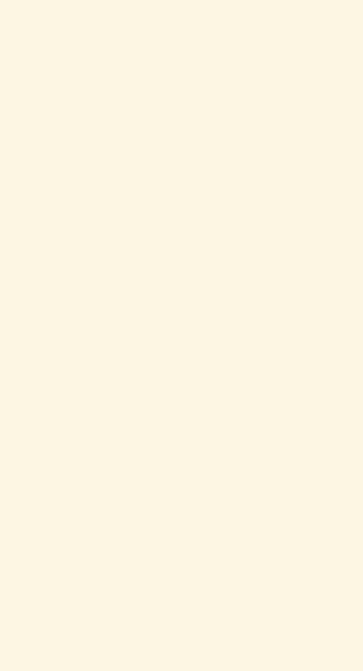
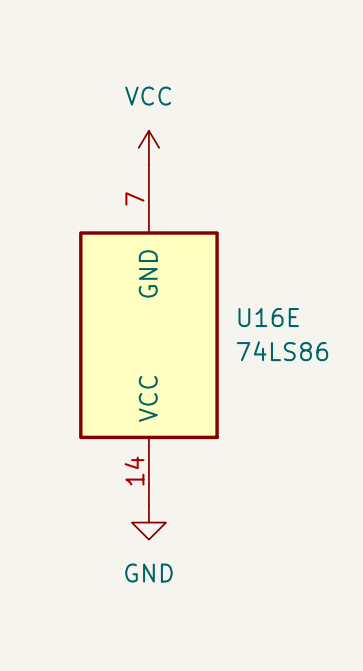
power symbol: none -> VCC (148, 147)
U16E: none -> 74LS86 (148, 335)
power symbol: none -> GND (148, 522)

